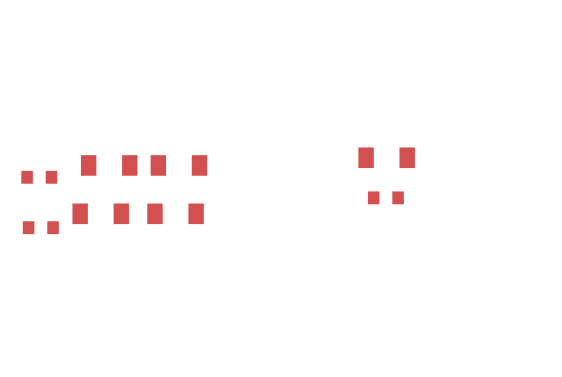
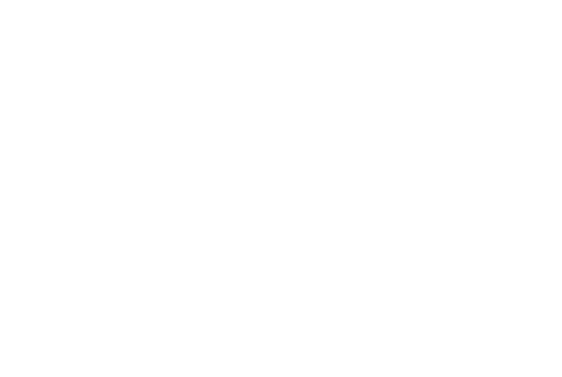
part: (386, 157) -> none
part: (109, 165) -> none
part: (178, 165) -> none
part: (39, 177) -> none
part: (385, 197) -> none
part: (100, 213) -> none
part: (175, 213) -> none
part: (40, 227) -> none

